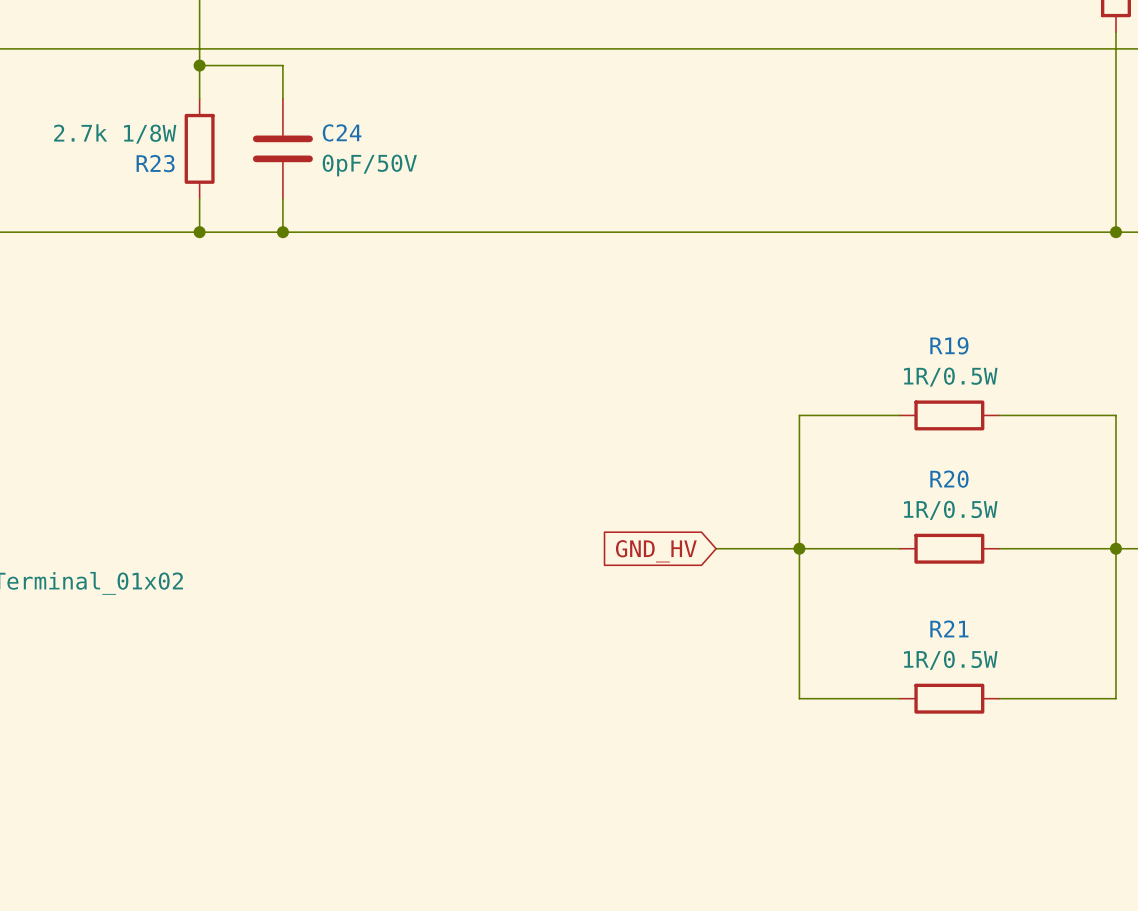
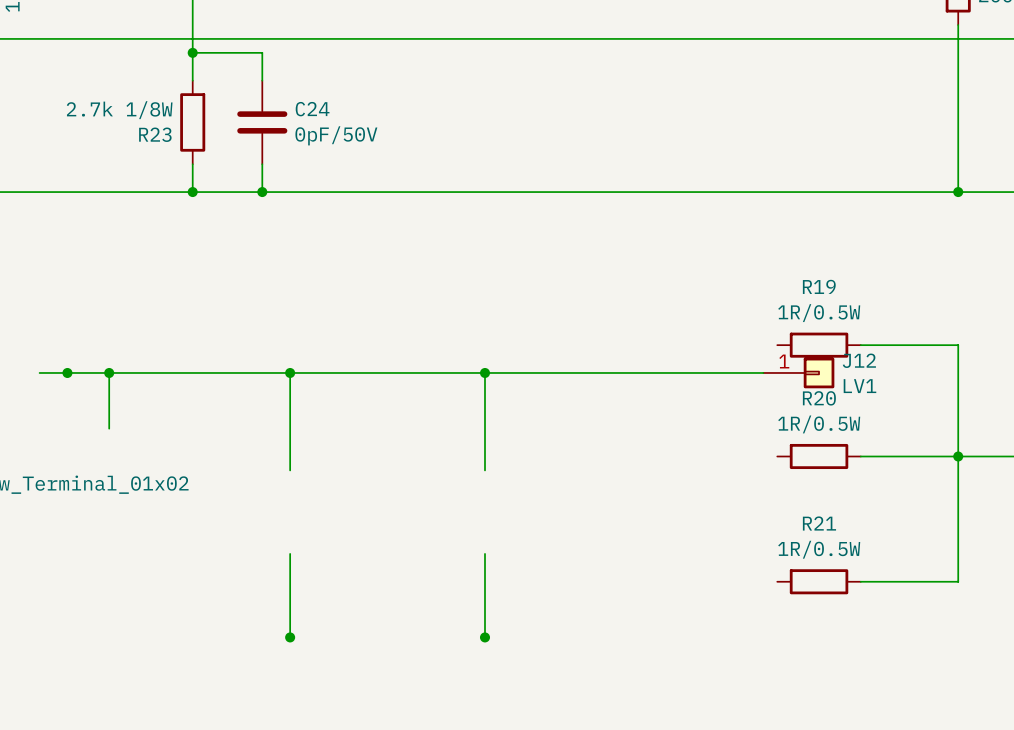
wire: (899, 415) (799, 415) (799, 698) (899, 698) -> none
wire: none -> (39, 372) (763, 372)
junction: none -> (67, 372)
wire: none -> (109, 372) (109, 428)
junction: none -> (109, 372)
wire: none -> (290, 372) (290, 470)
junction: none -> (290, 372)
wire: none -> (484, 372) (484, 470)
junction: none -> (484, 372)
J12: none -> LV1 (798, 372)
wire: (716, 548) (899, 548) -> none
junction: (799, 548) -> none
global label: GND_HV (656, 551) -> none
wire: none -> (290, 553) (290, 637)
wire: none -> (484, 553) (484, 637)
junction: none -> (290, 637)
junction: none -> (484, 637)

